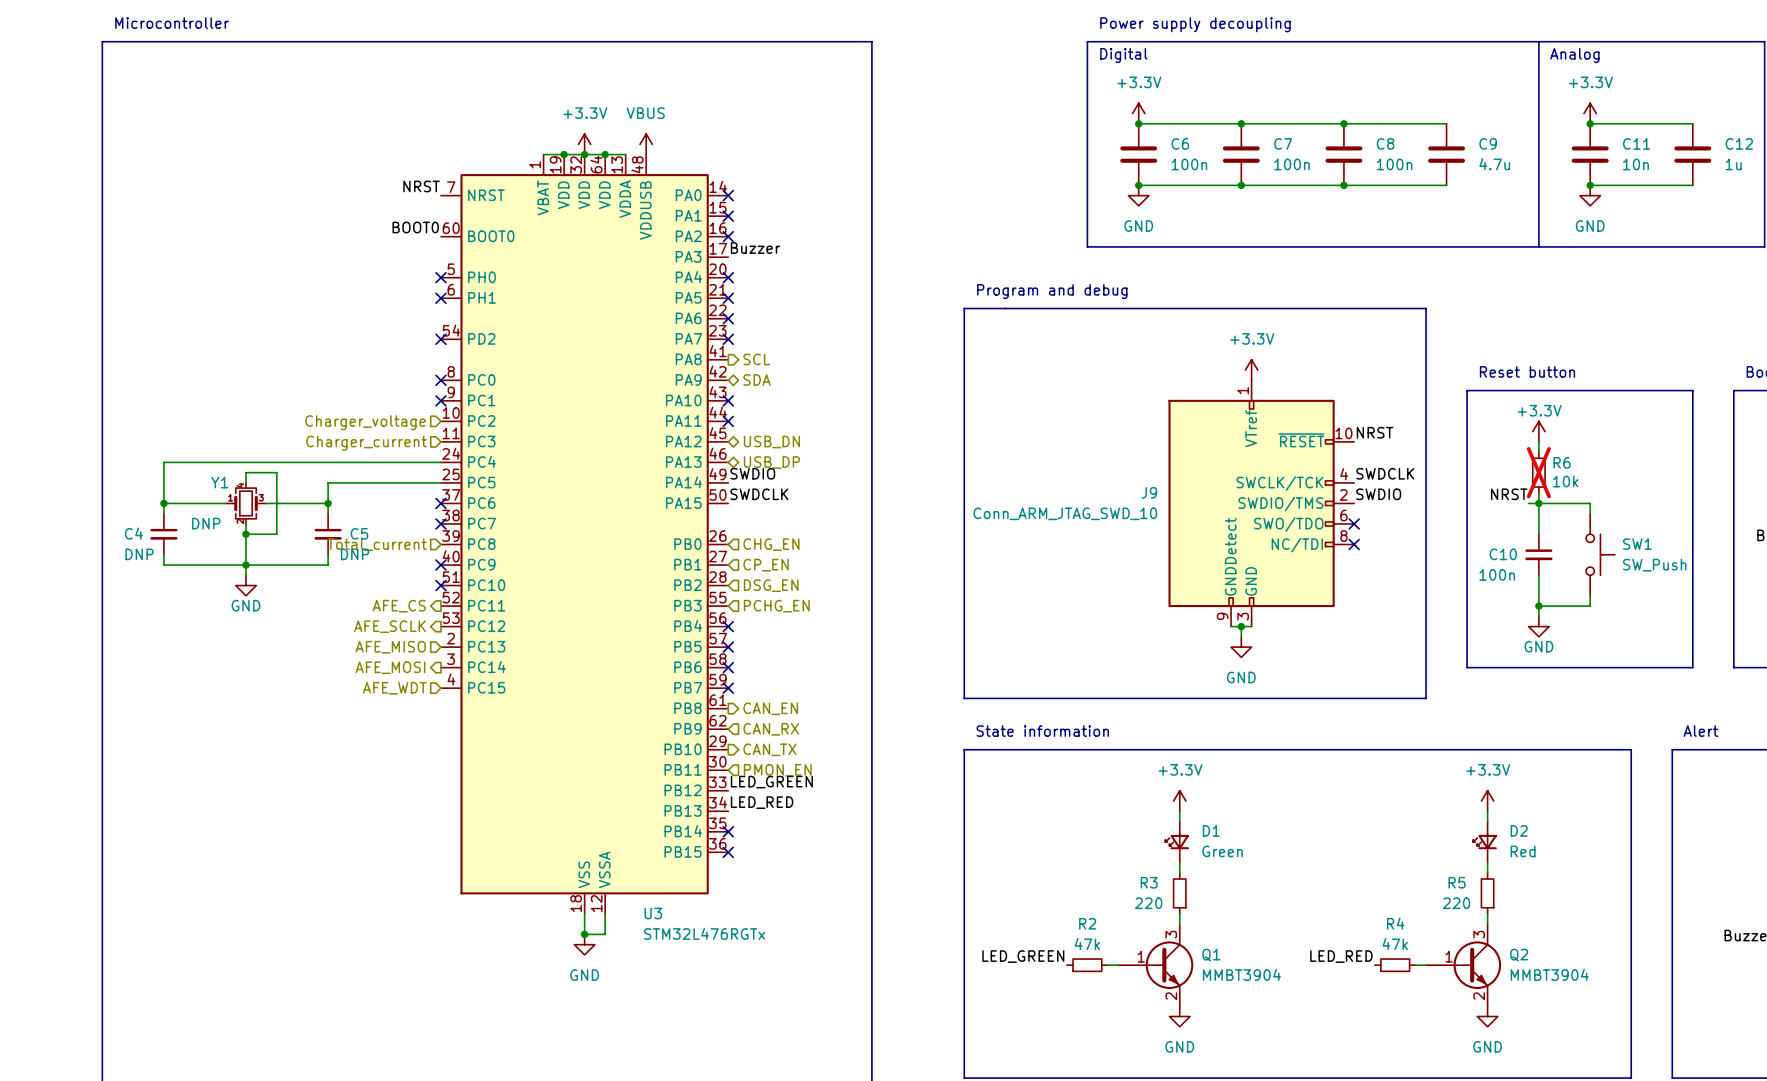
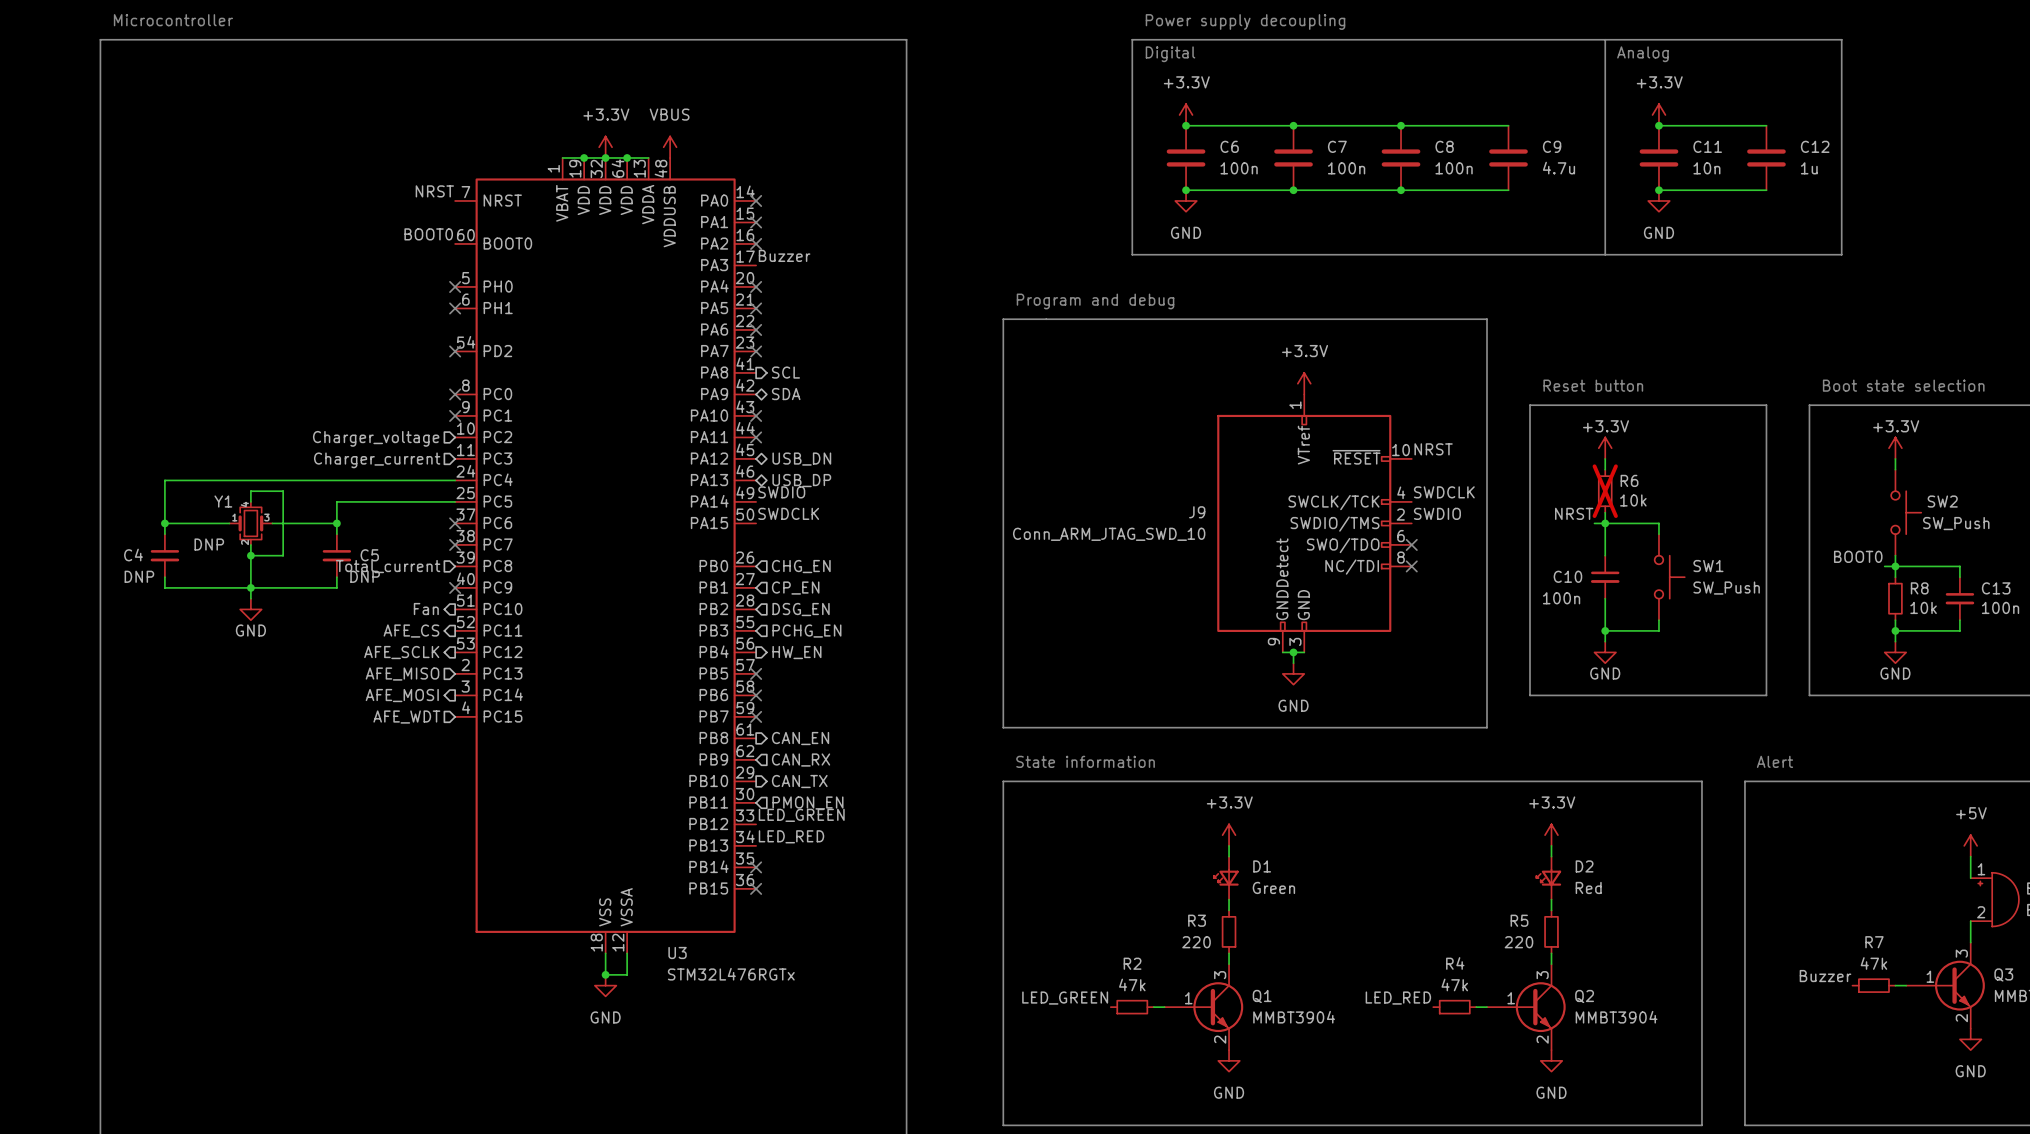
hierarchical label: none -> Fan (426, 609)
no-connect mark: (440, 585) -> none
no-connect mark: (728, 626) -> none
hierarchical label: none -> HW_EN (796, 652)

